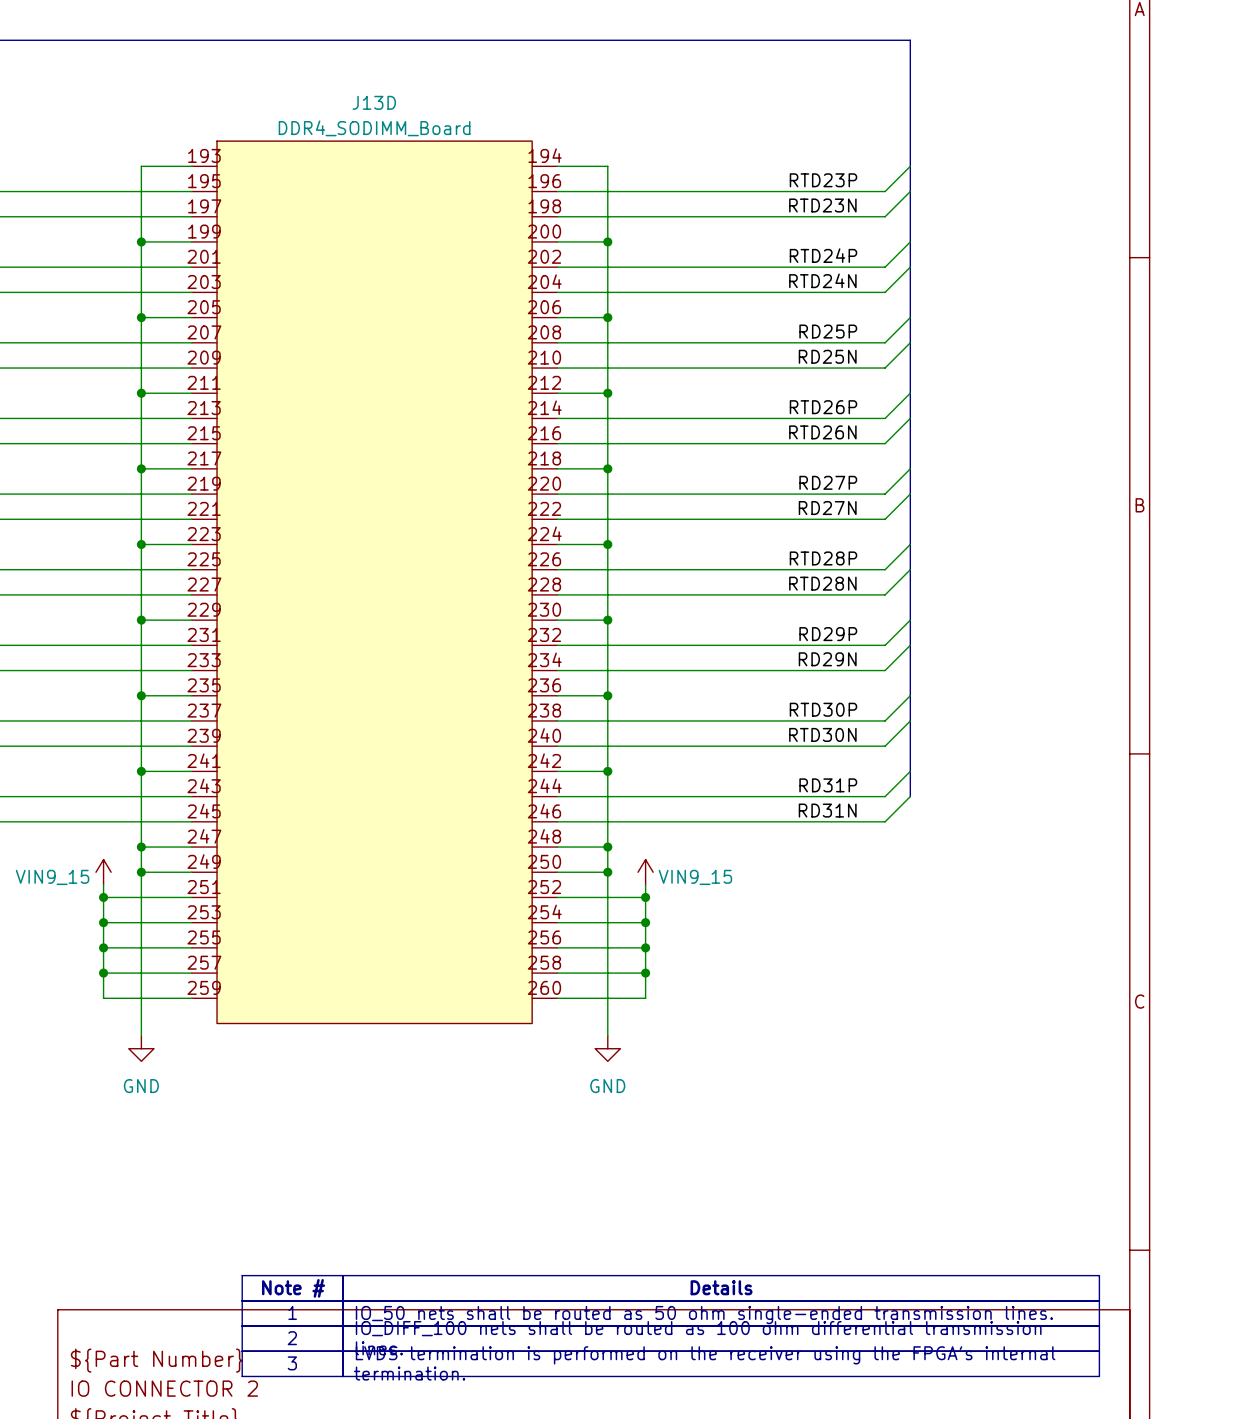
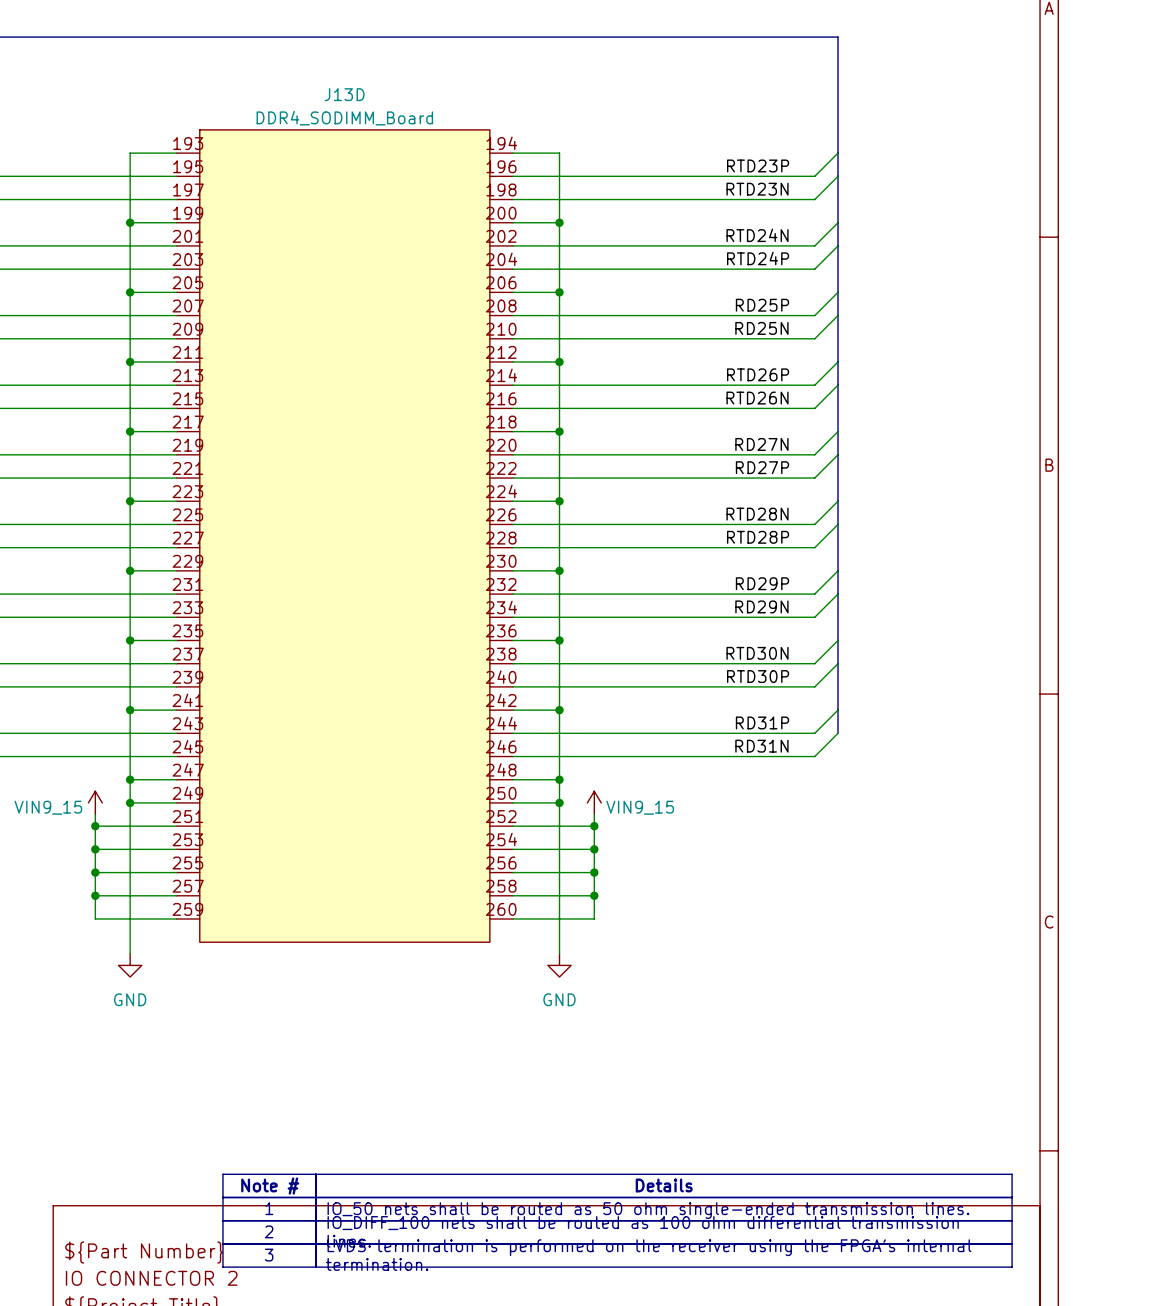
label: RTD24P (823, 255) -> RTD24N (757, 235)
label: RTD24N (822, 280) -> RTD24P (758, 258)
label: RD27P (828, 482) -> RD27N (761, 444)
label: RD27N (827, 508) -> RD27P (762, 467)
label: RTD28P (823, 558) -> RTD28N (757, 514)
label: RTD28N (822, 583) -> RTD28P (758, 537)
label: RTD30P (823, 709) -> RTD30N (757, 653)
label: RTD30N (822, 734) -> RTD30P (758, 676)

